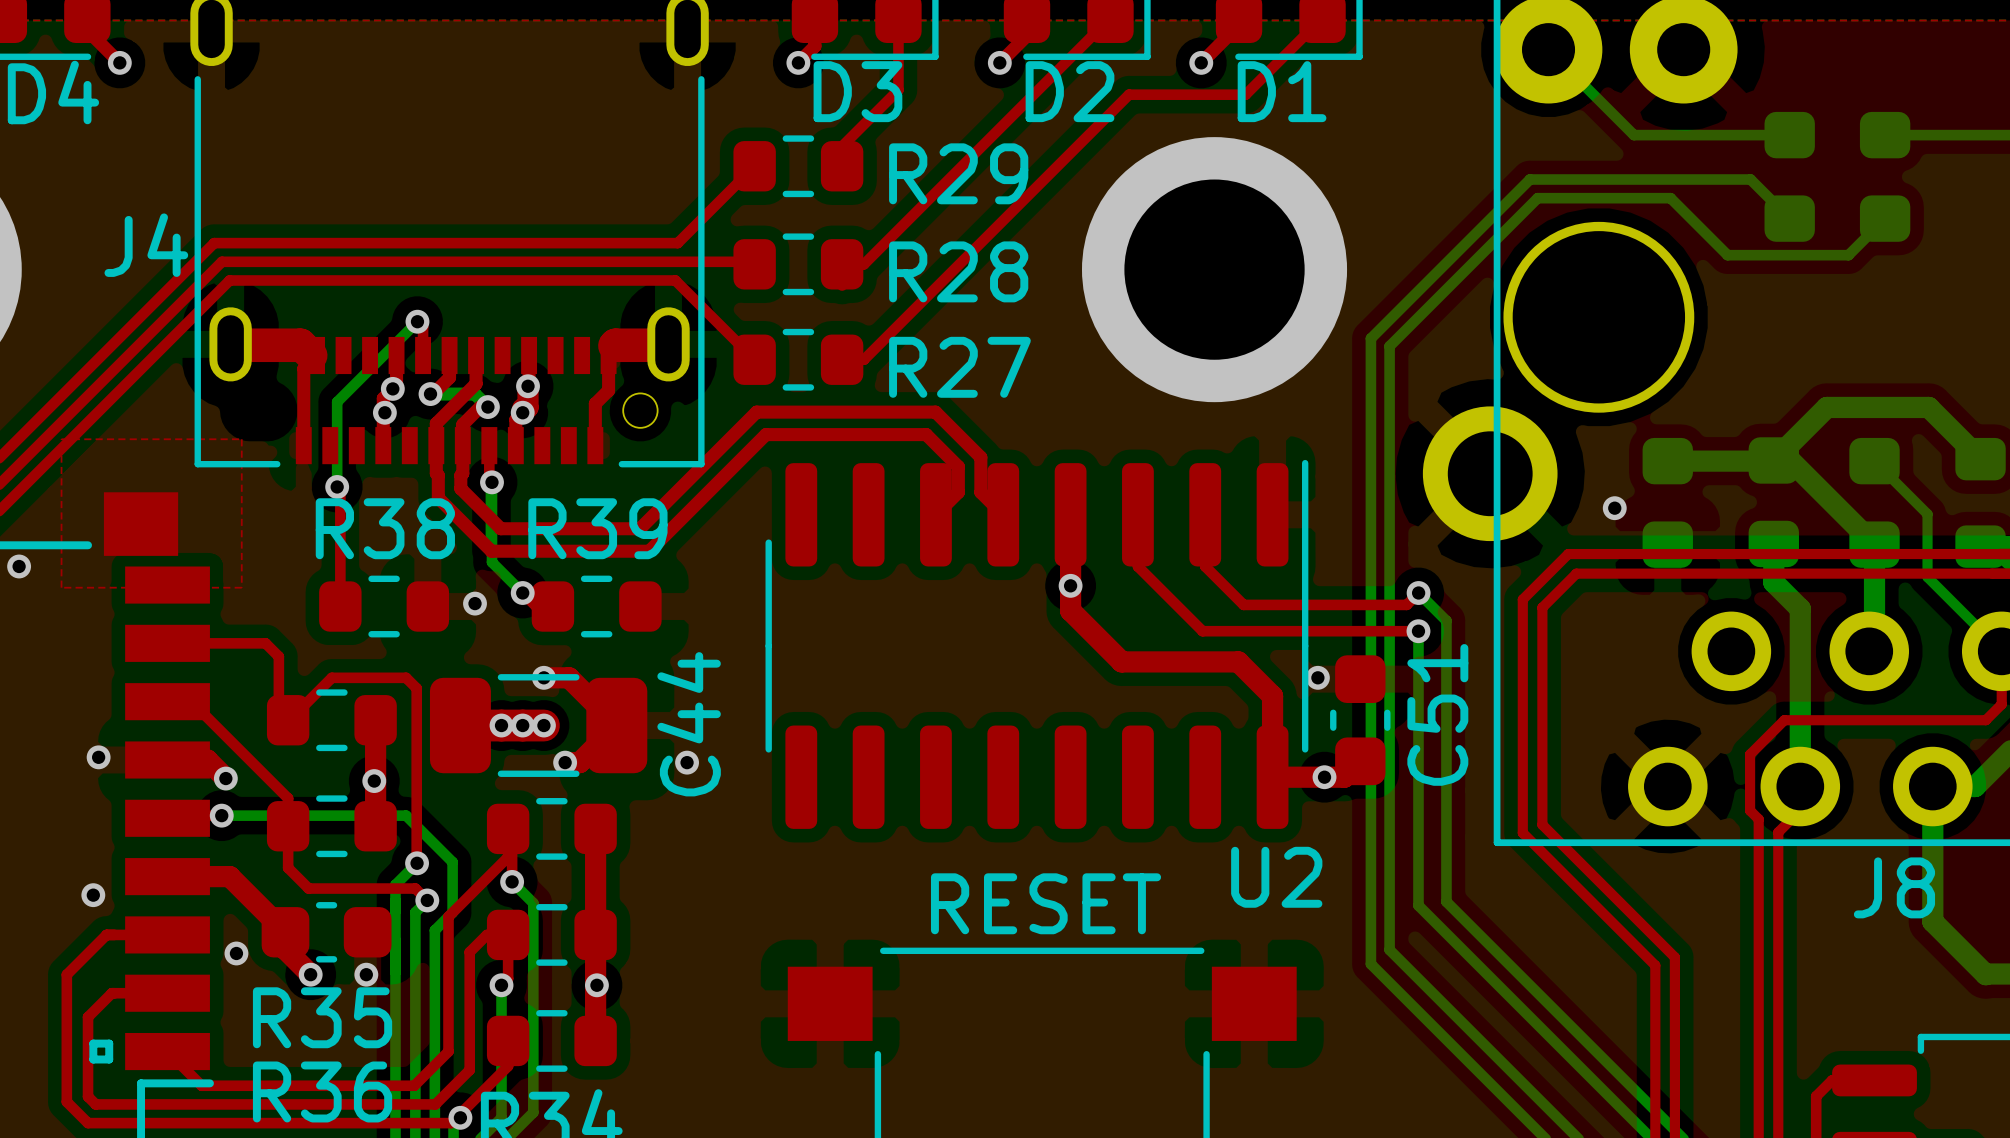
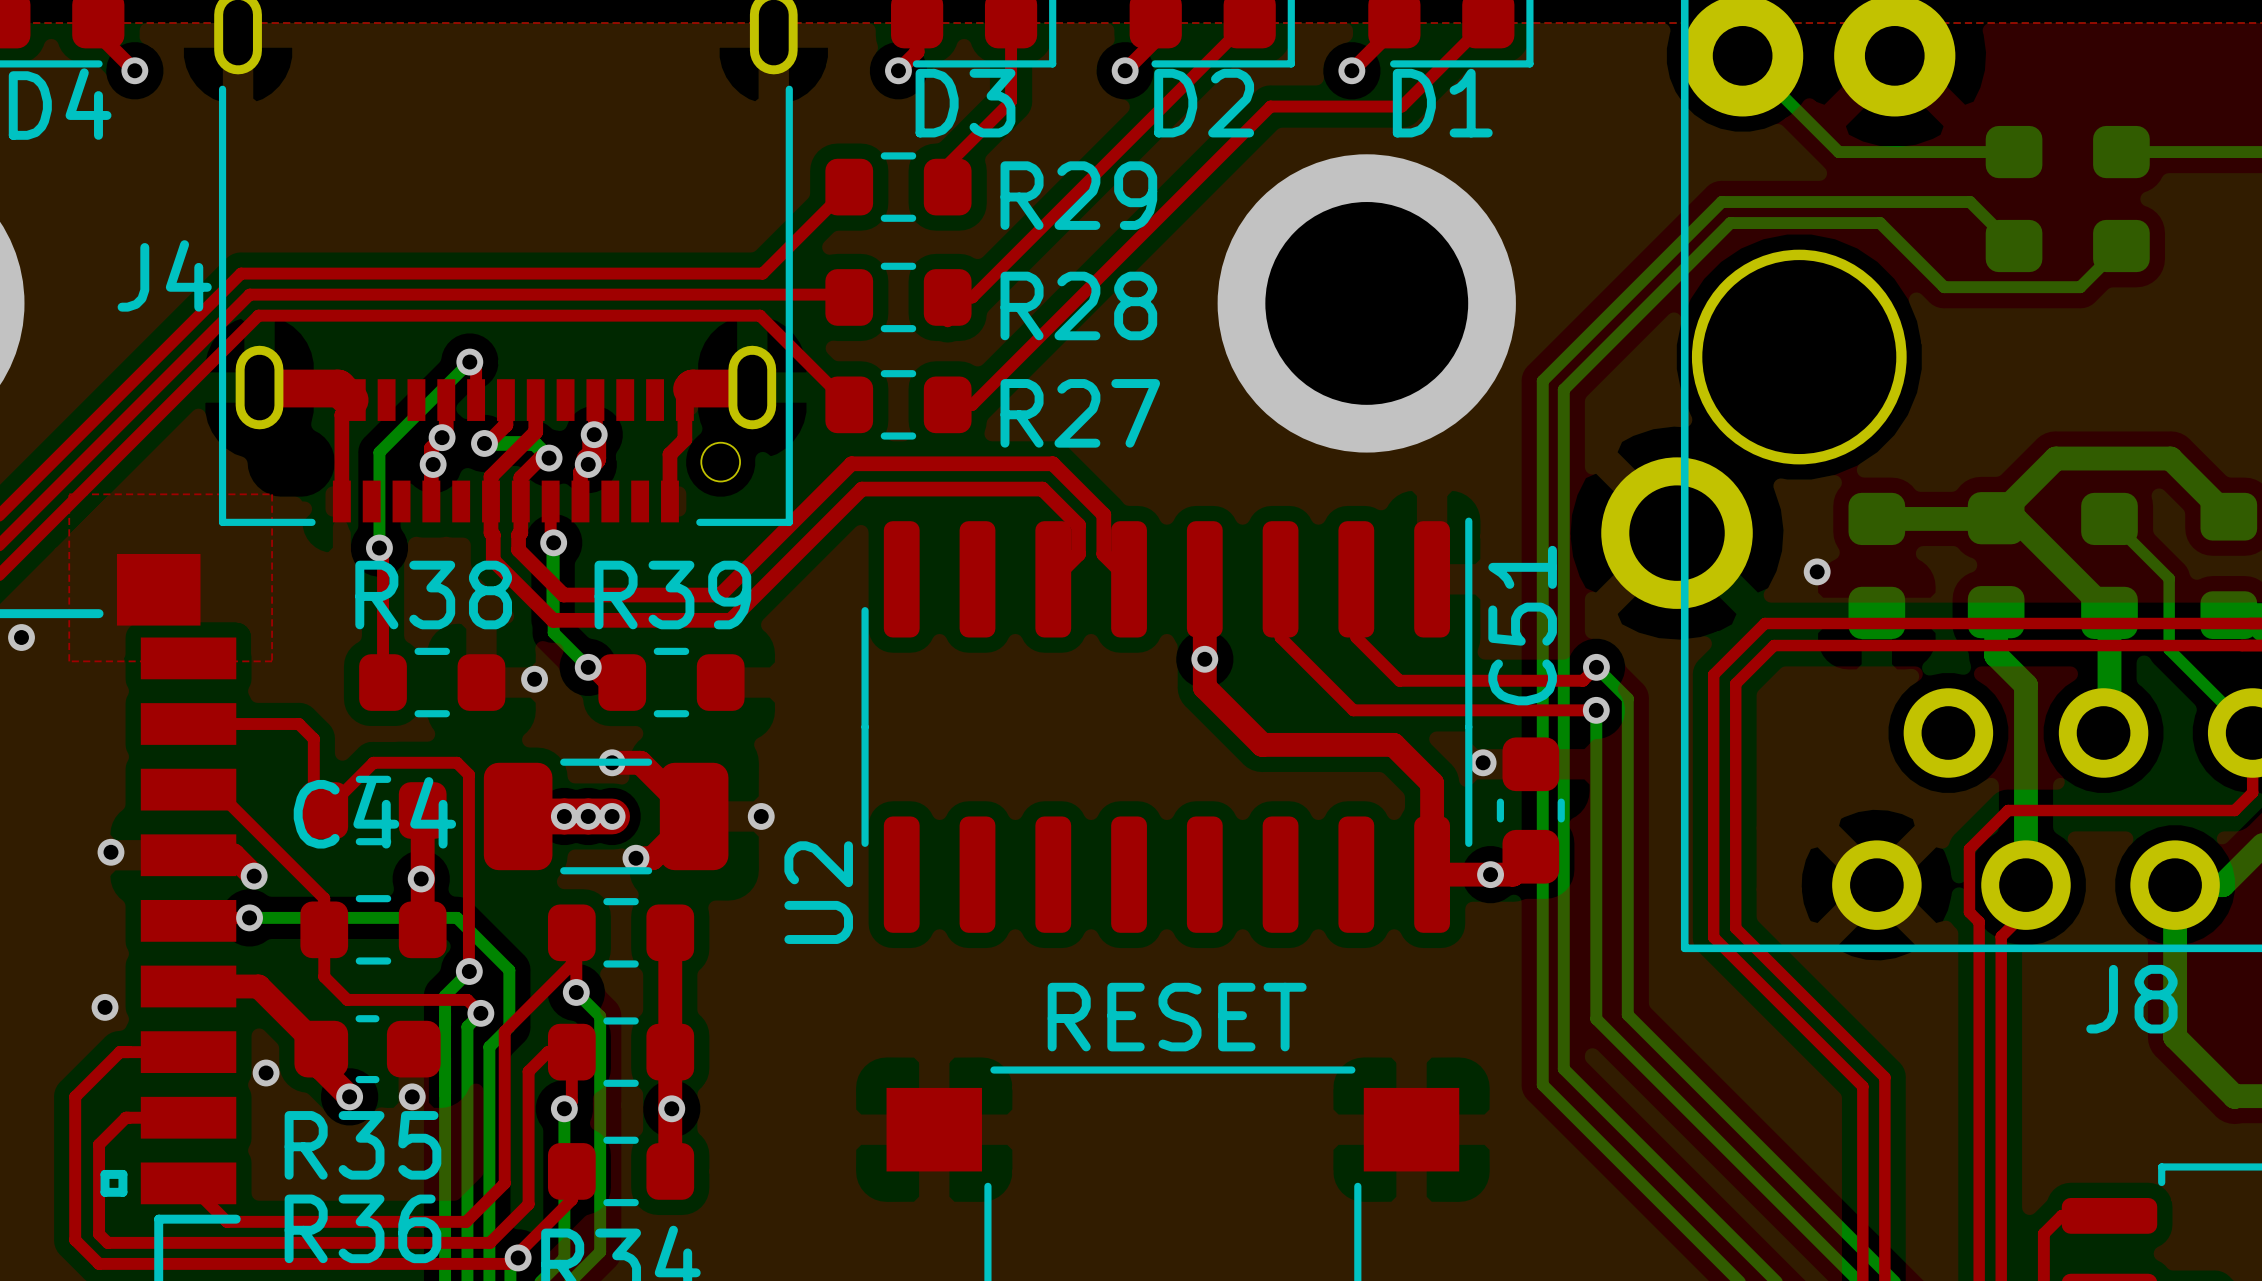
C51 name position: C51 (1437, 714) -> C51 (1522, 625)
C44 name rotation: 0° (689, 724) -> 90° clockwise (374, 812)
C44 name position: C44 (689, 724) -> C44 (374, 812)
via position: (687, 762) -> (761, 816)
U2 name rotation: 0° (1276, 877) -> 90° counterclockwise (818, 892)
U2 name position: U2 (1276, 877) -> U2 (818, 892)

